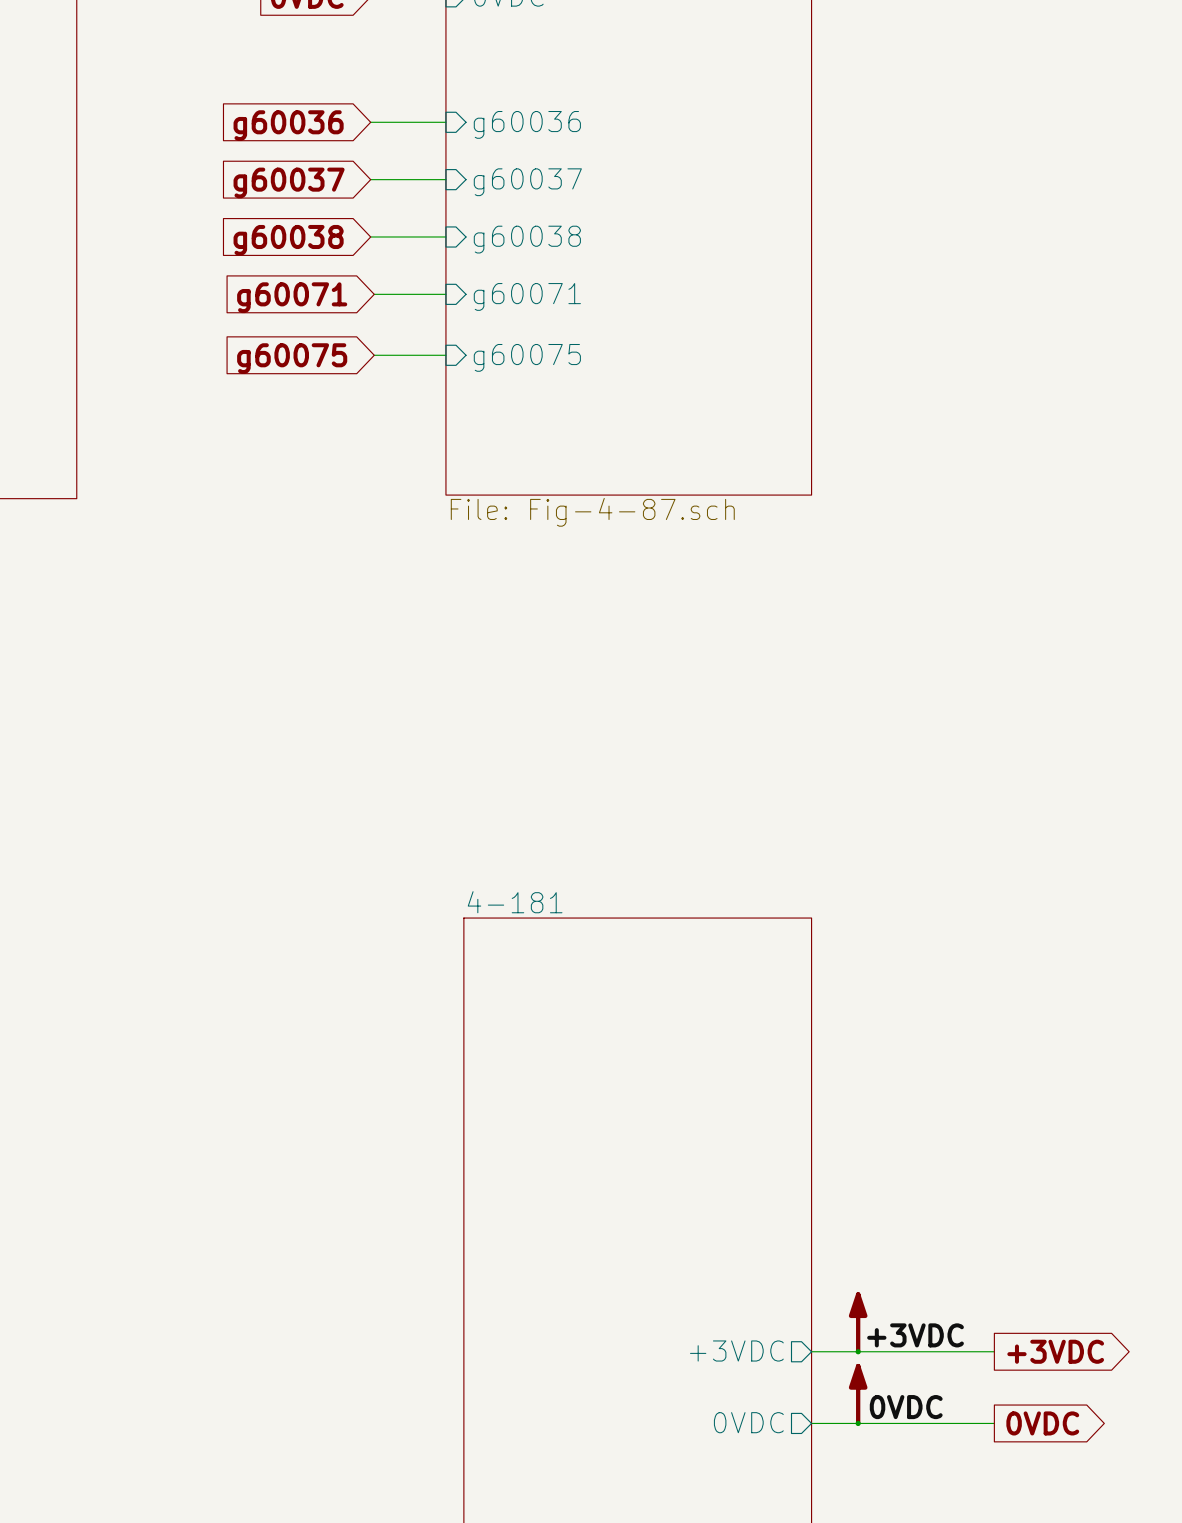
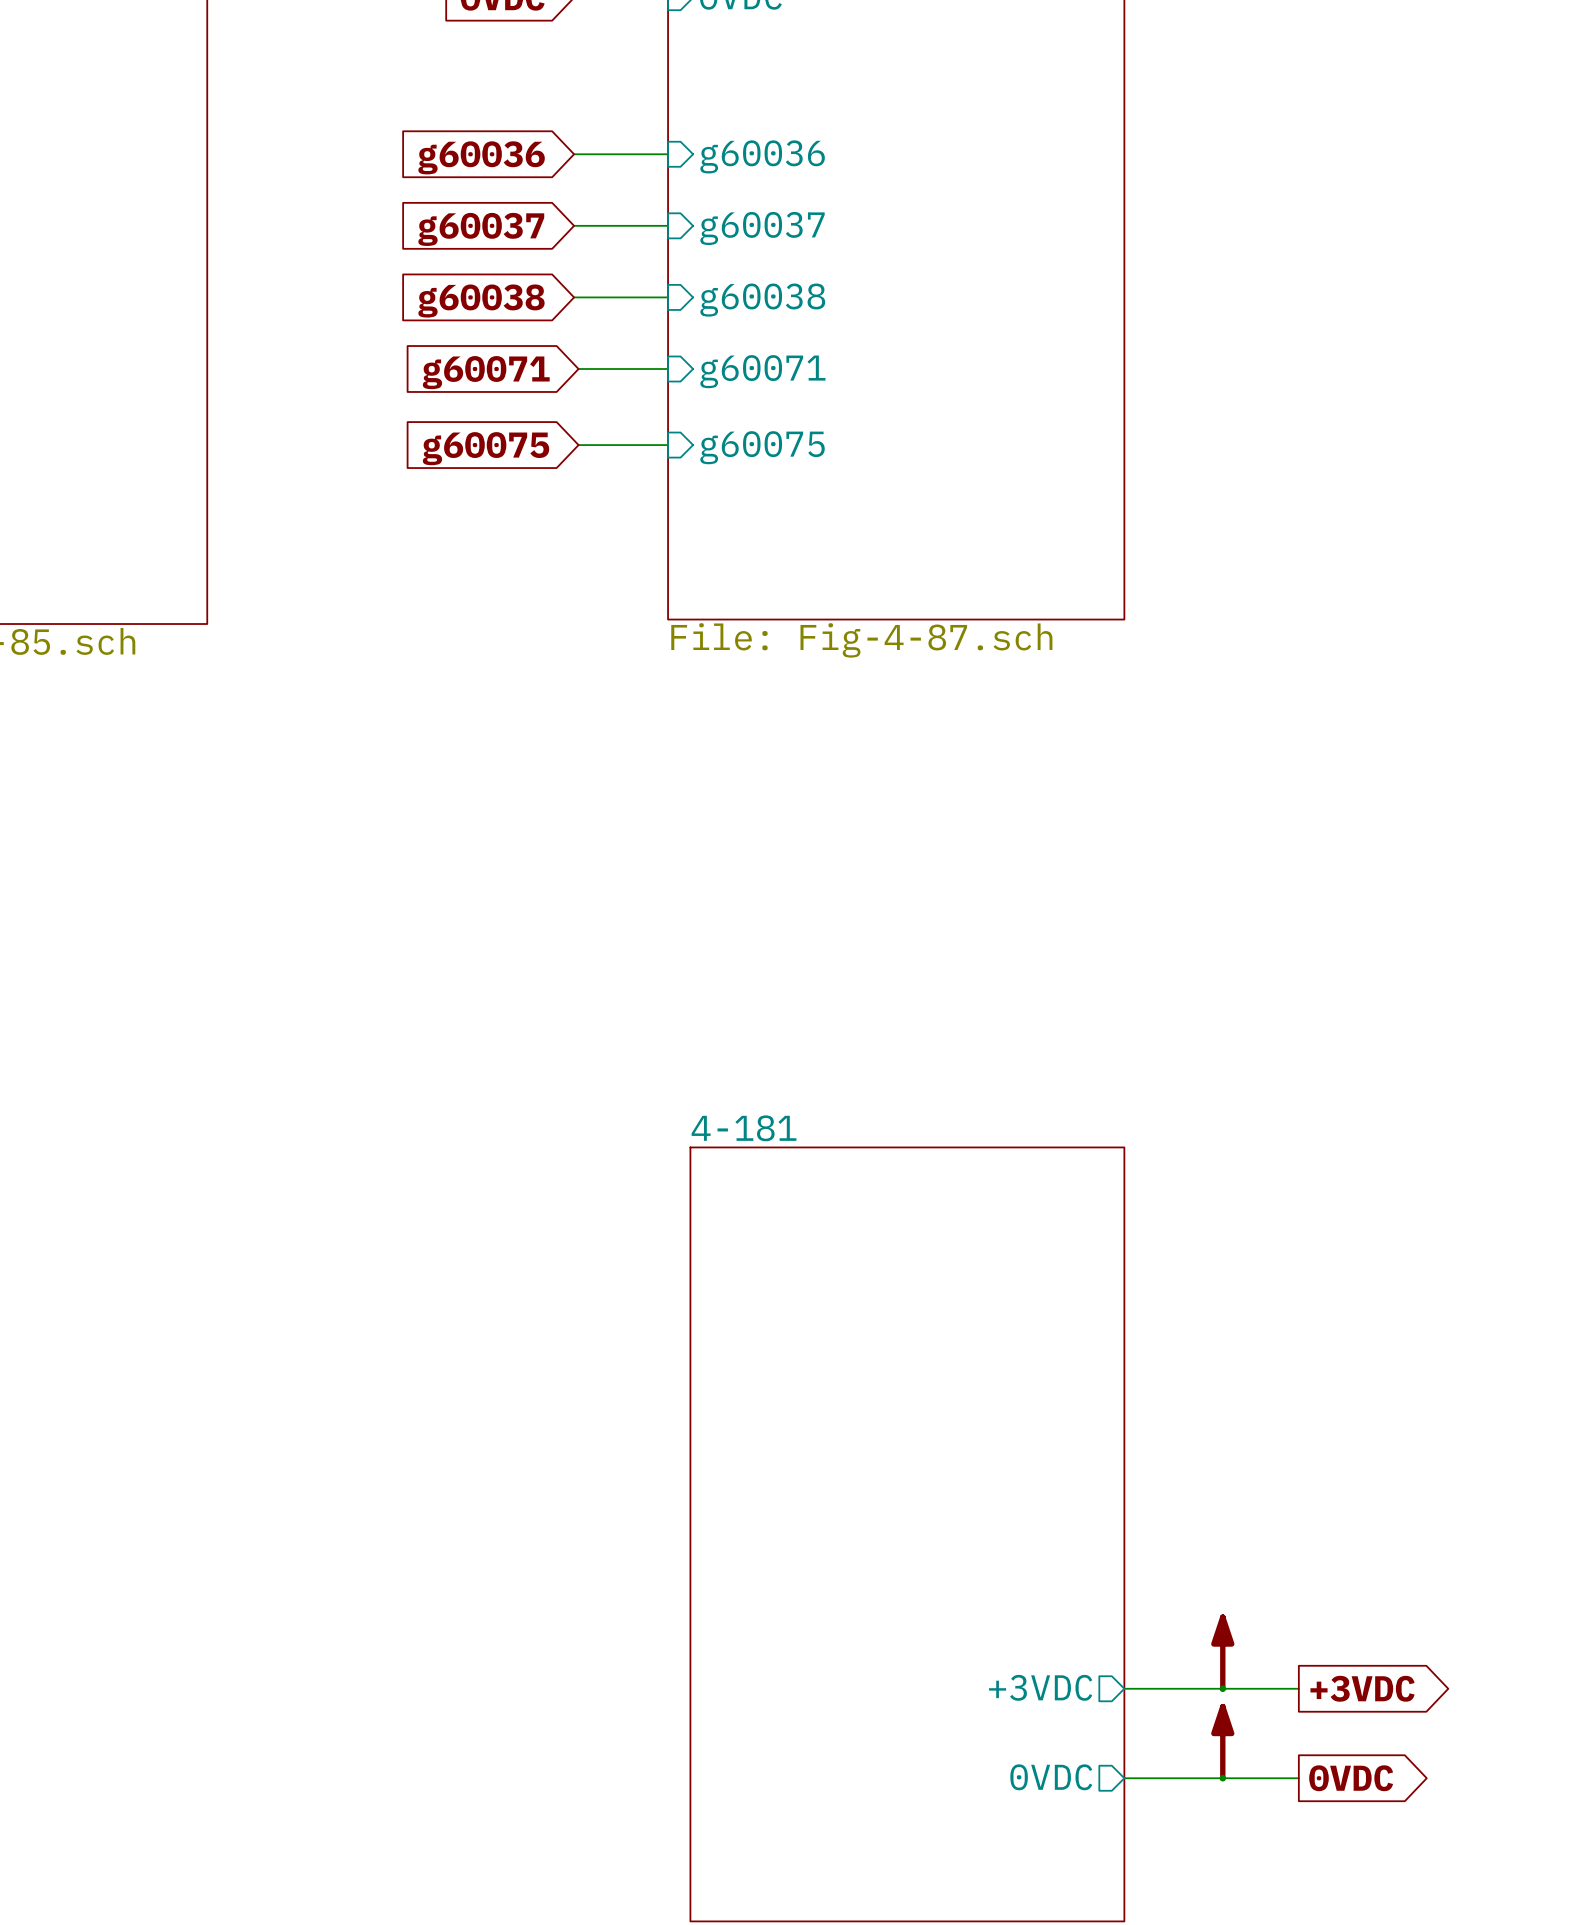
power symbol position: (858, 1323) -> (1222, 1652)
label: +3VDC (915, 1335) -> none
junction position: (858, 1351) -> (1222, 1688)
wire: (951, 1351) (994, 1351) -> none
global label position: +3VDC (1055, 1351) -> +3VDC (1362, 1688)
power symbol position: (858, 1394) -> (1222, 1742)
label: 0VDC (906, 1407) -> none
junction position: (858, 1423) -> (1222, 1778)
wire: (951, 1423) (994, 1423) -> none
global label position: 0VDC (1042, 1423) -> 0VDC (1351, 1778)

